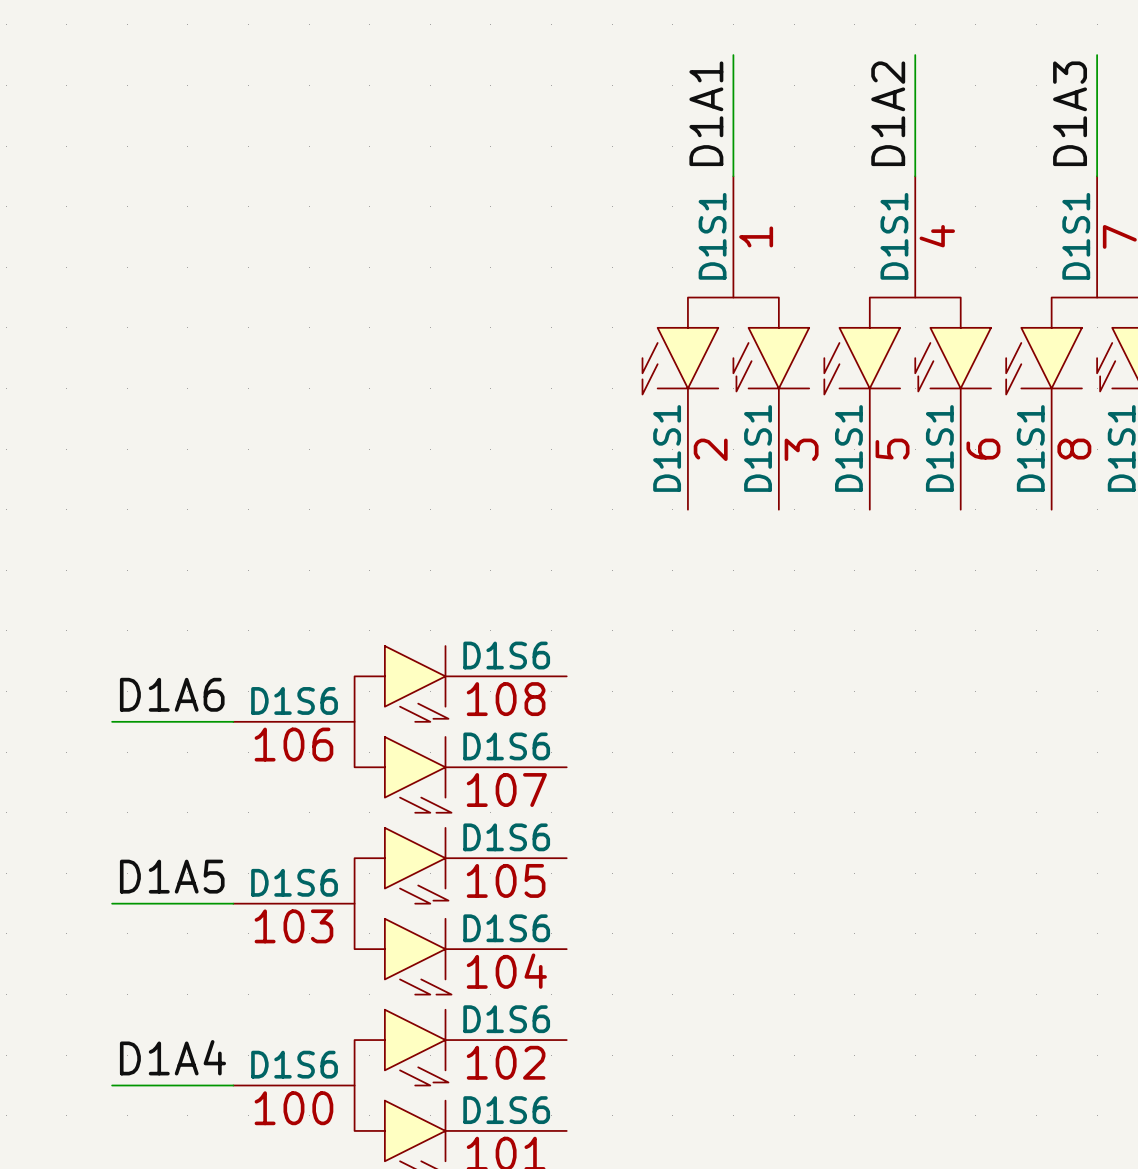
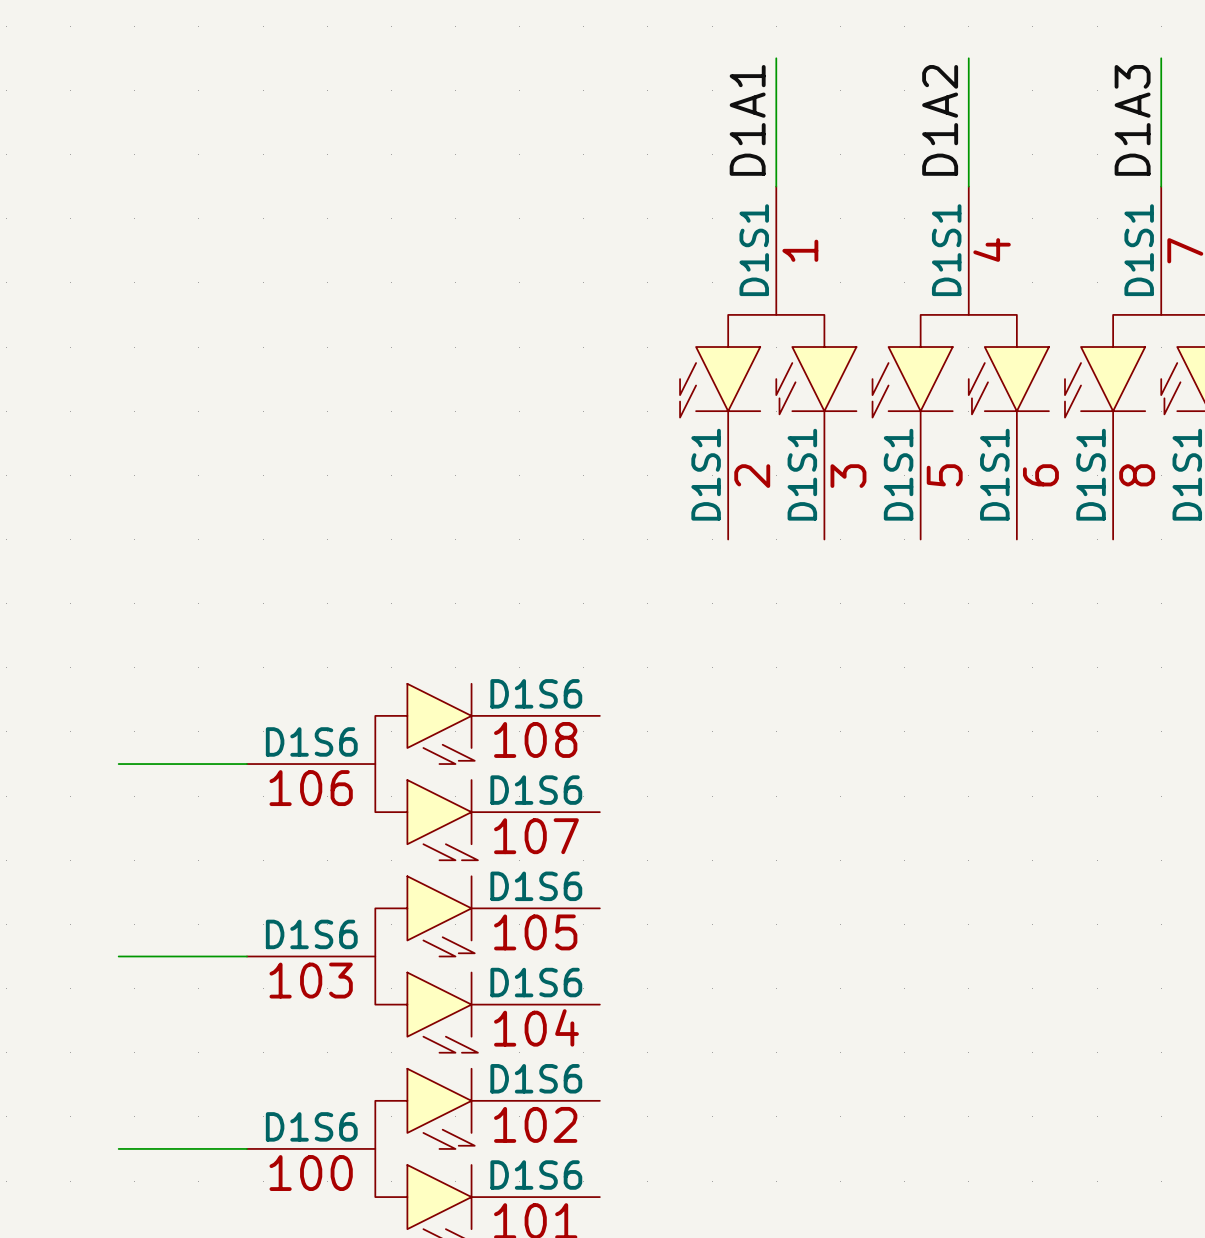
label: D1A6 (172, 694) -> none
label: D1A5 (172, 876) -> none
label: D1A4 (172, 1057) -> none

